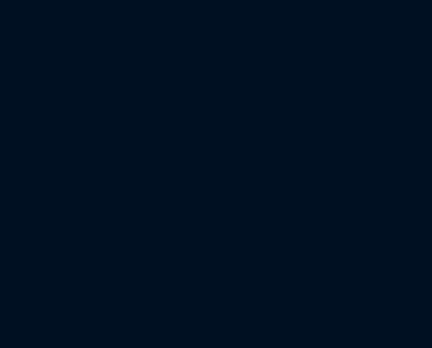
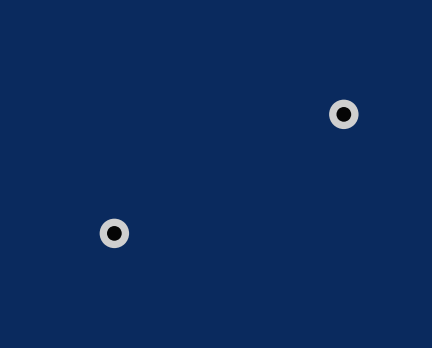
part: none -> (343, 114)
part: none -> (114, 233)

